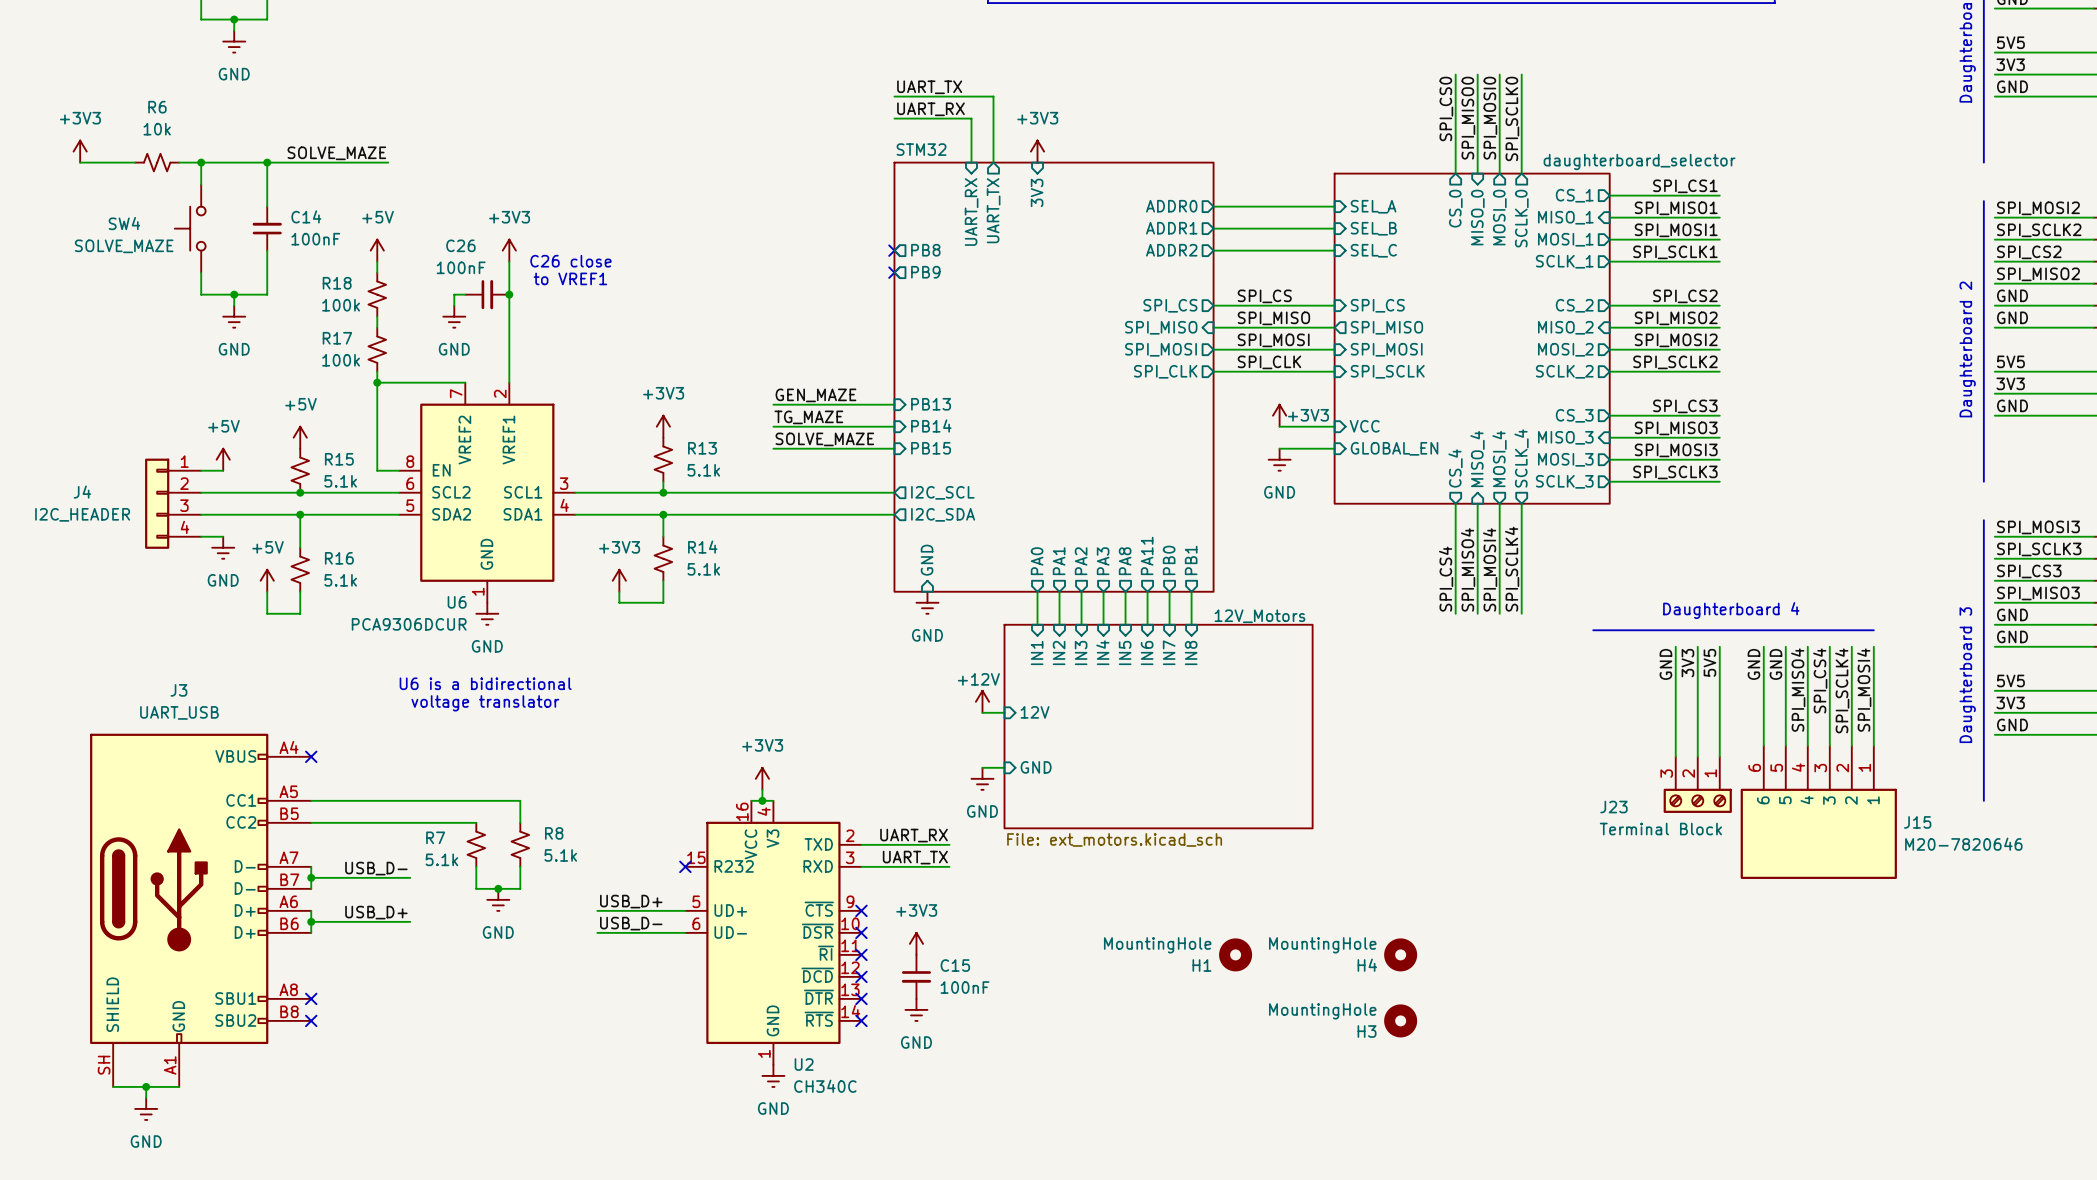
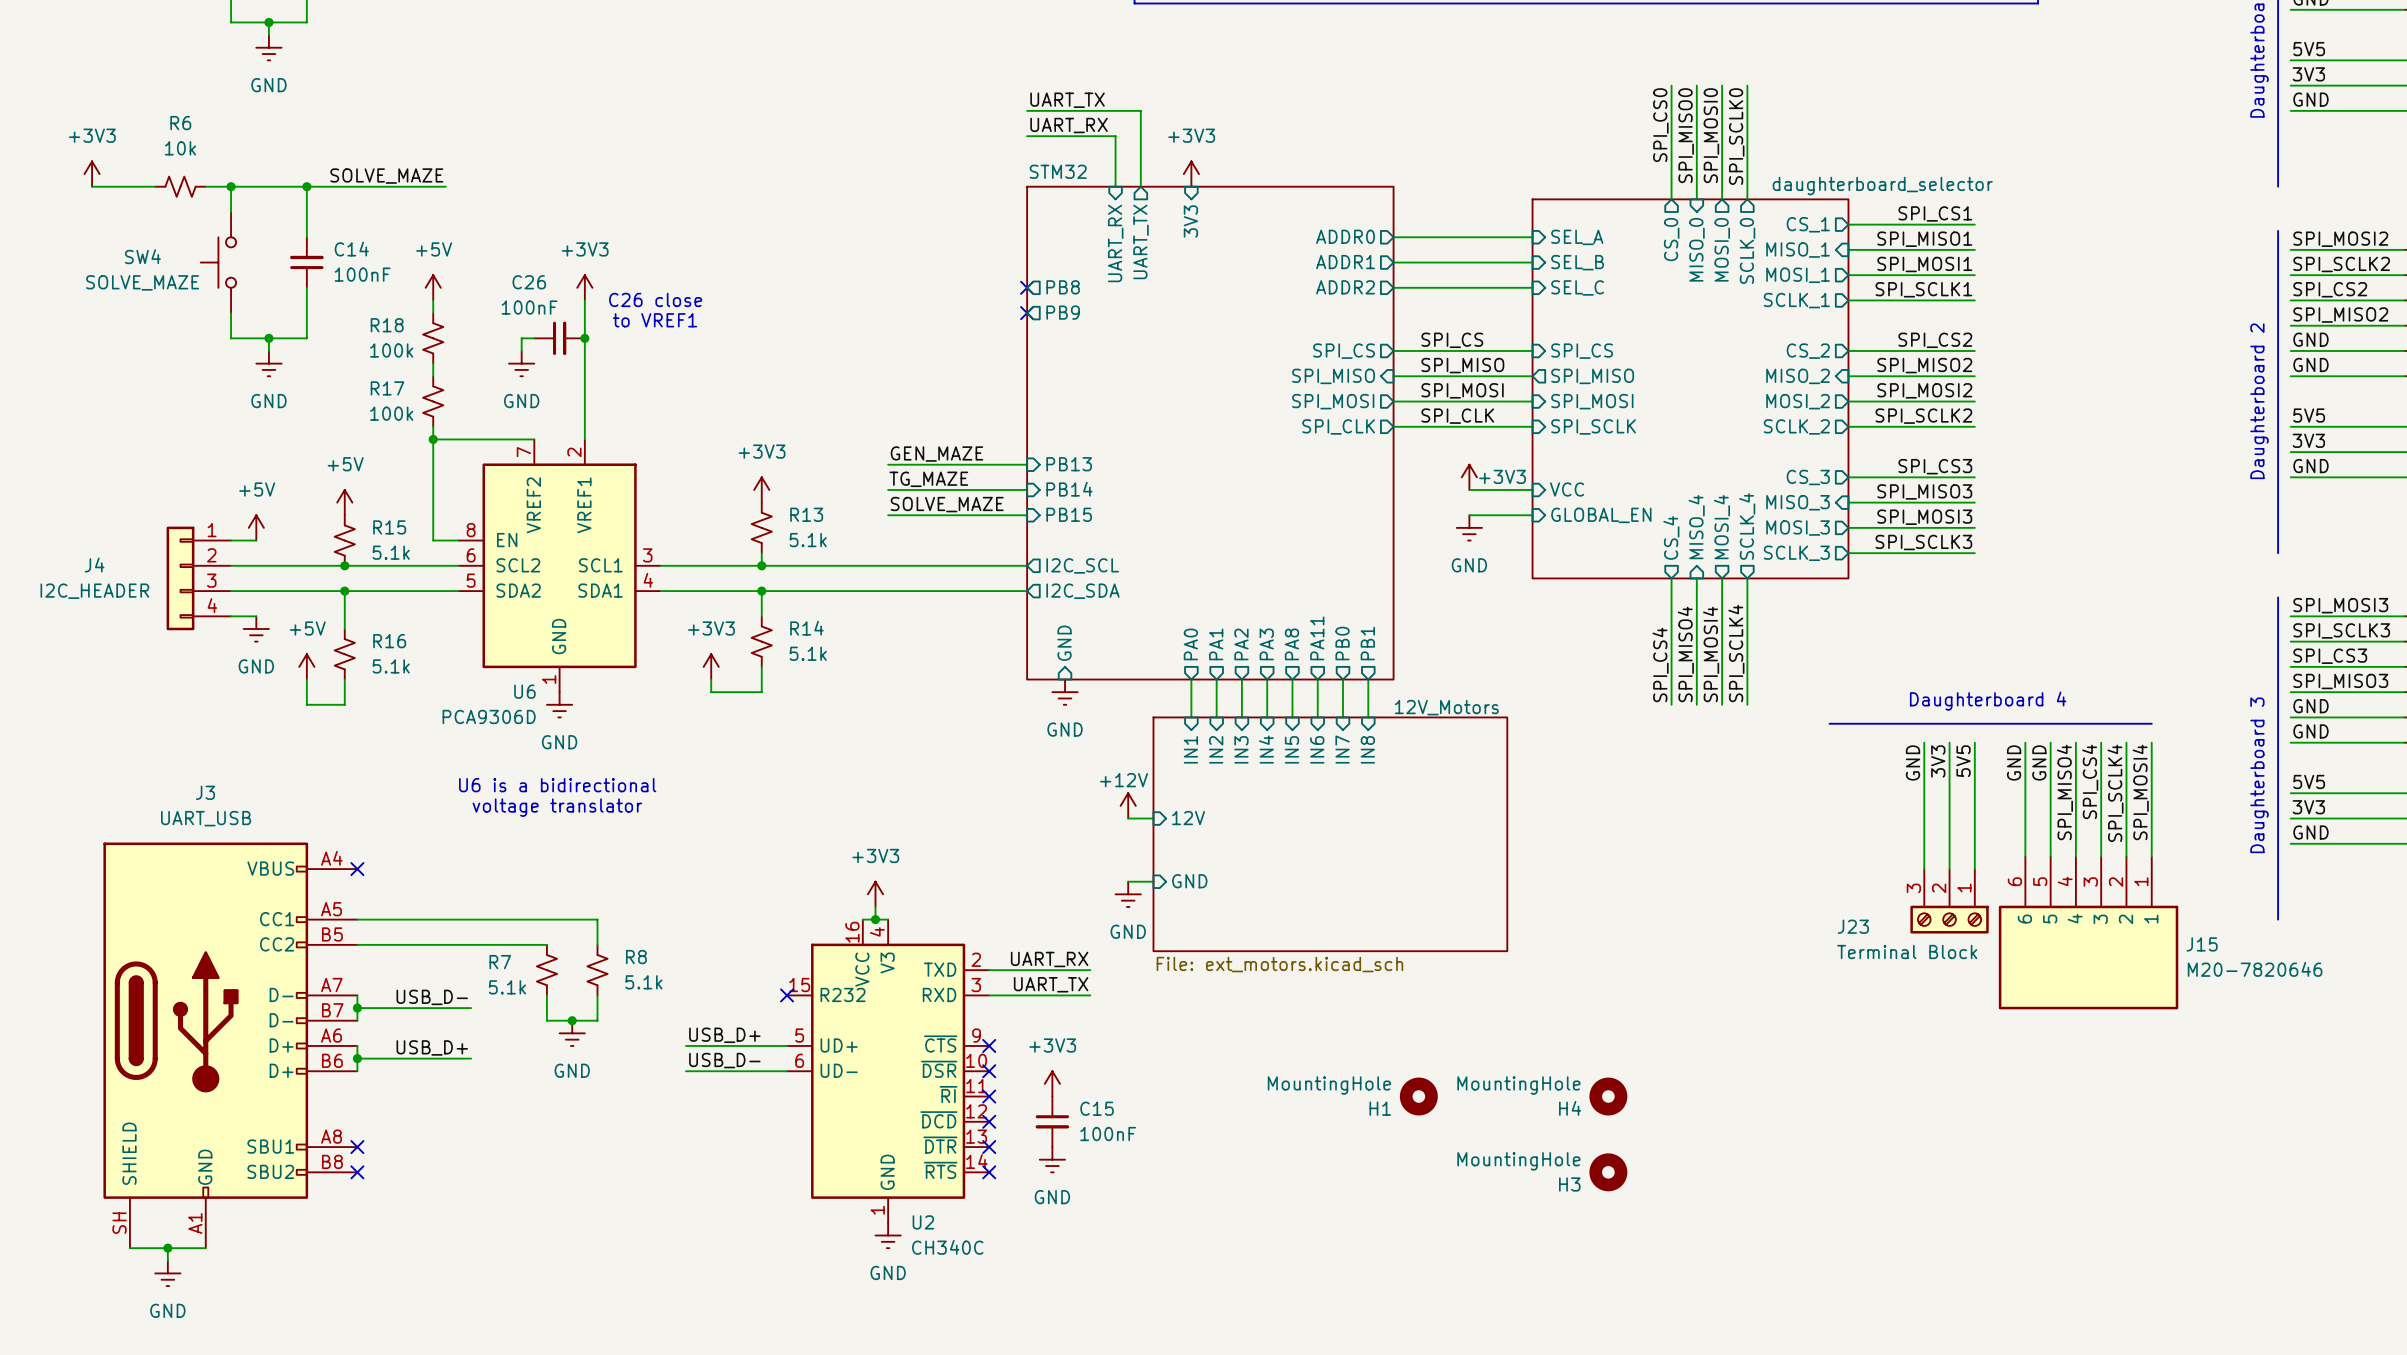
U6 value: PCA9306DCUR (409, 624) -> PCA9306D (489, 716)

